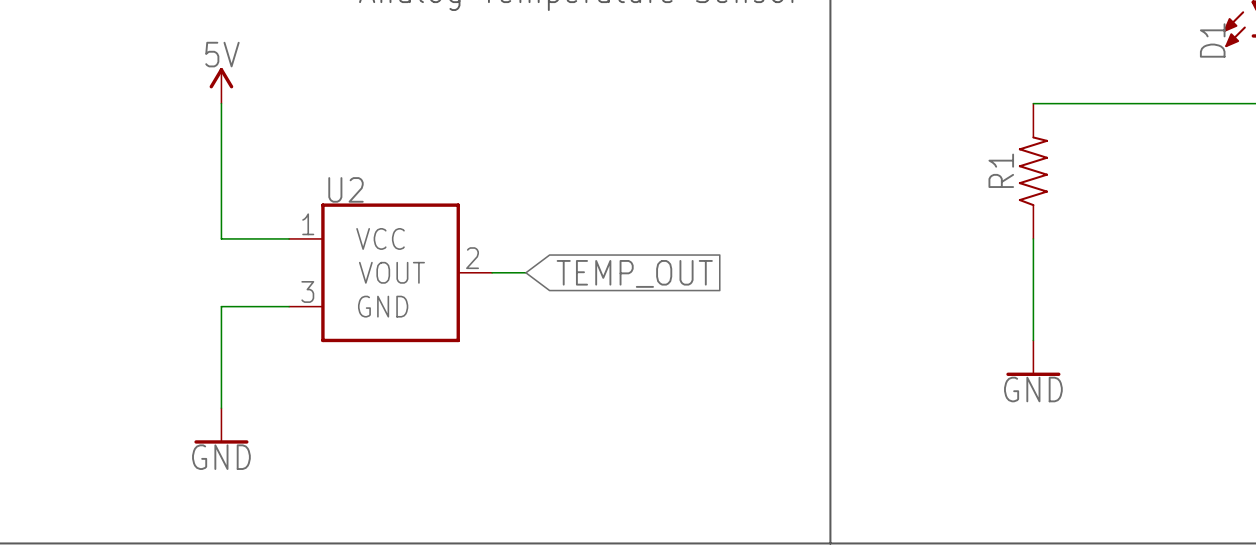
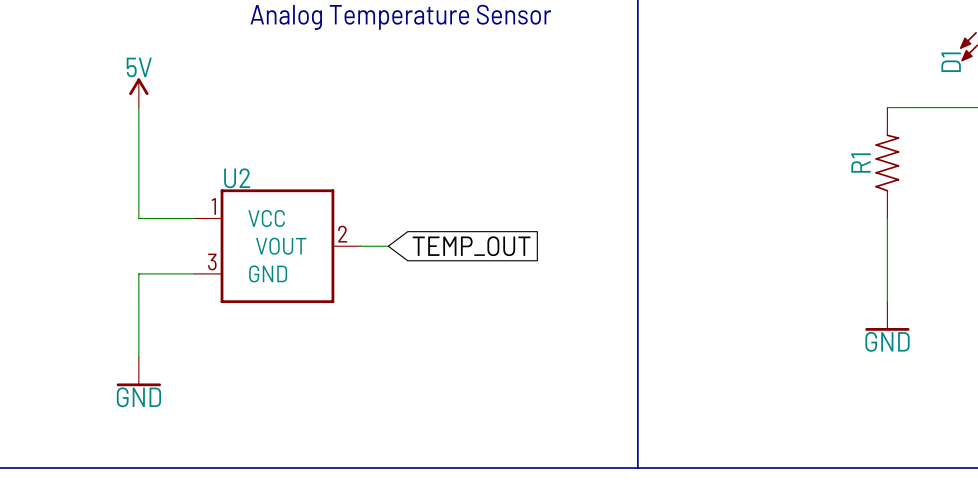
wire: (1033, 103) (1134, 103) -> none
R1 position: (1033, 171) -> (887, 163)
wire: (1033, 238) (1033, 340) -> (887, 218) (887, 301)
power symbol position: GND (1033, 358) -> GND (887, 316)

